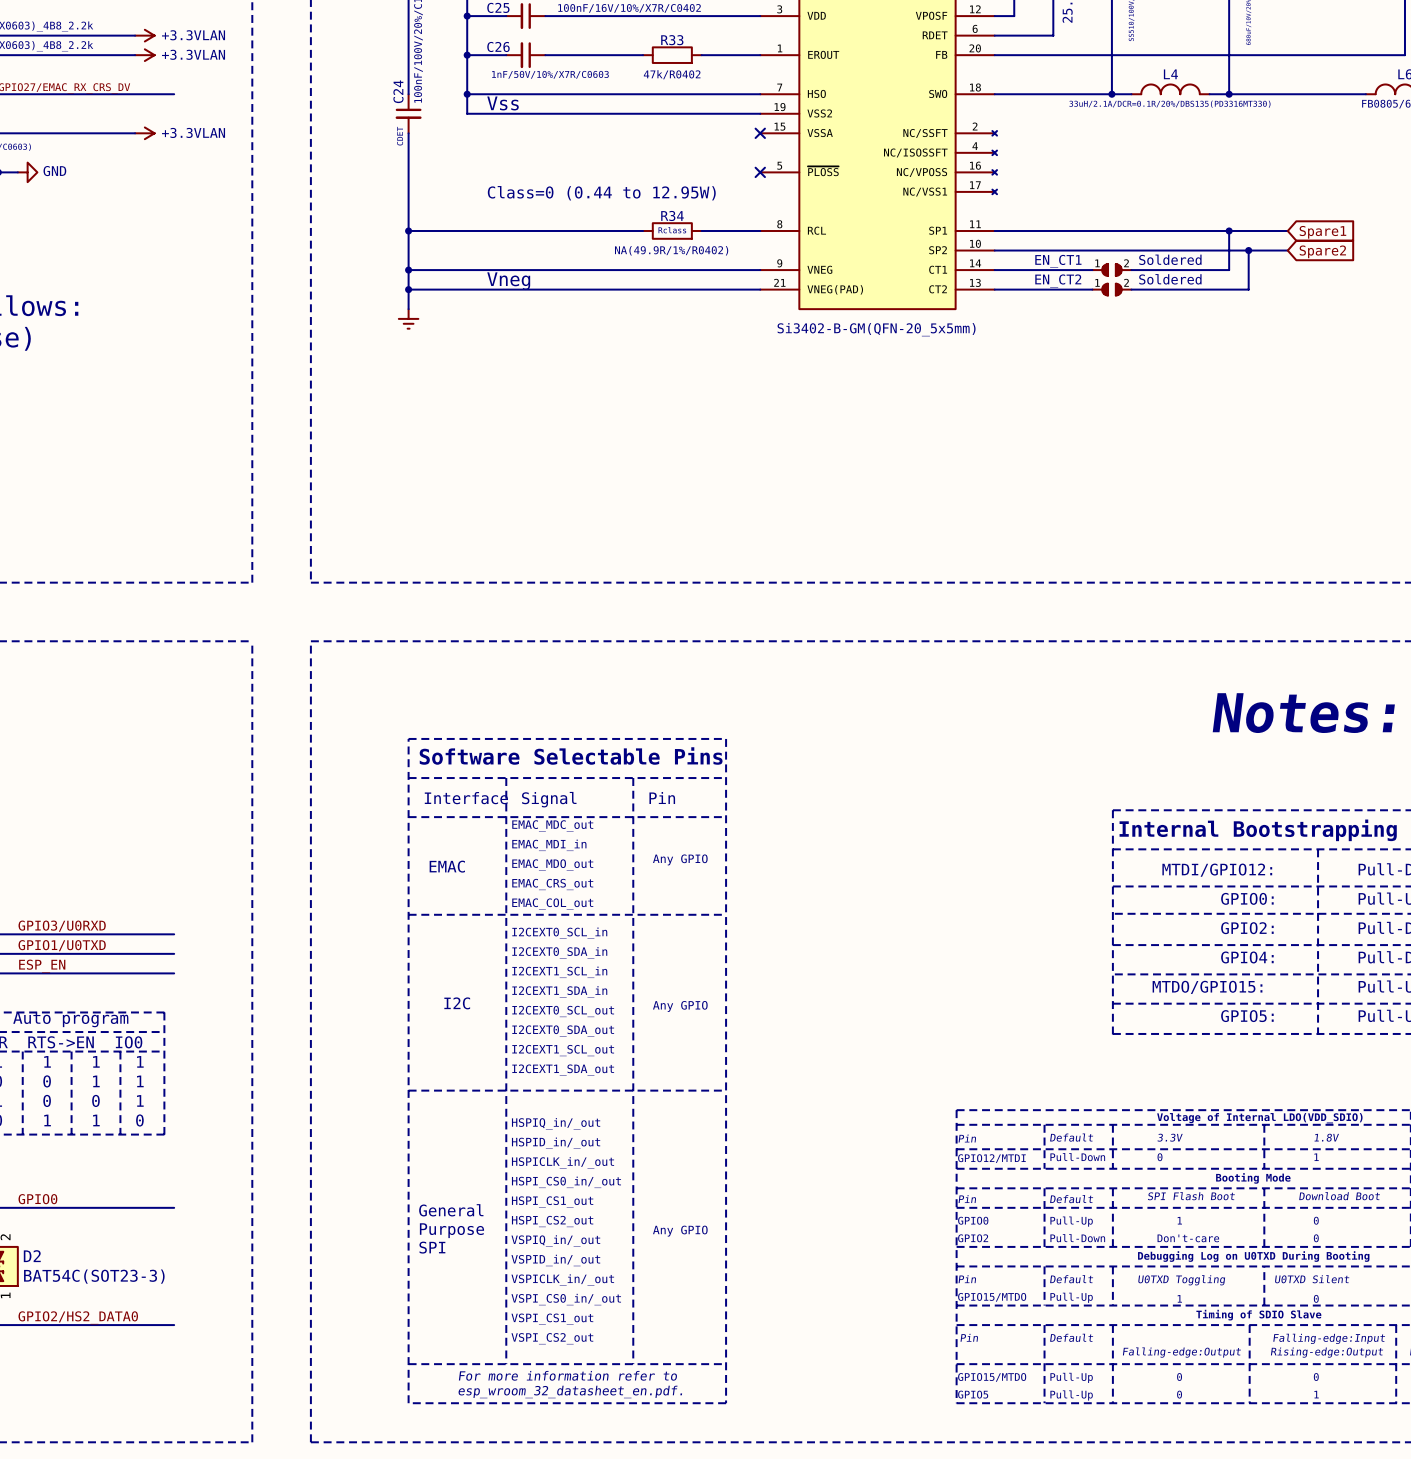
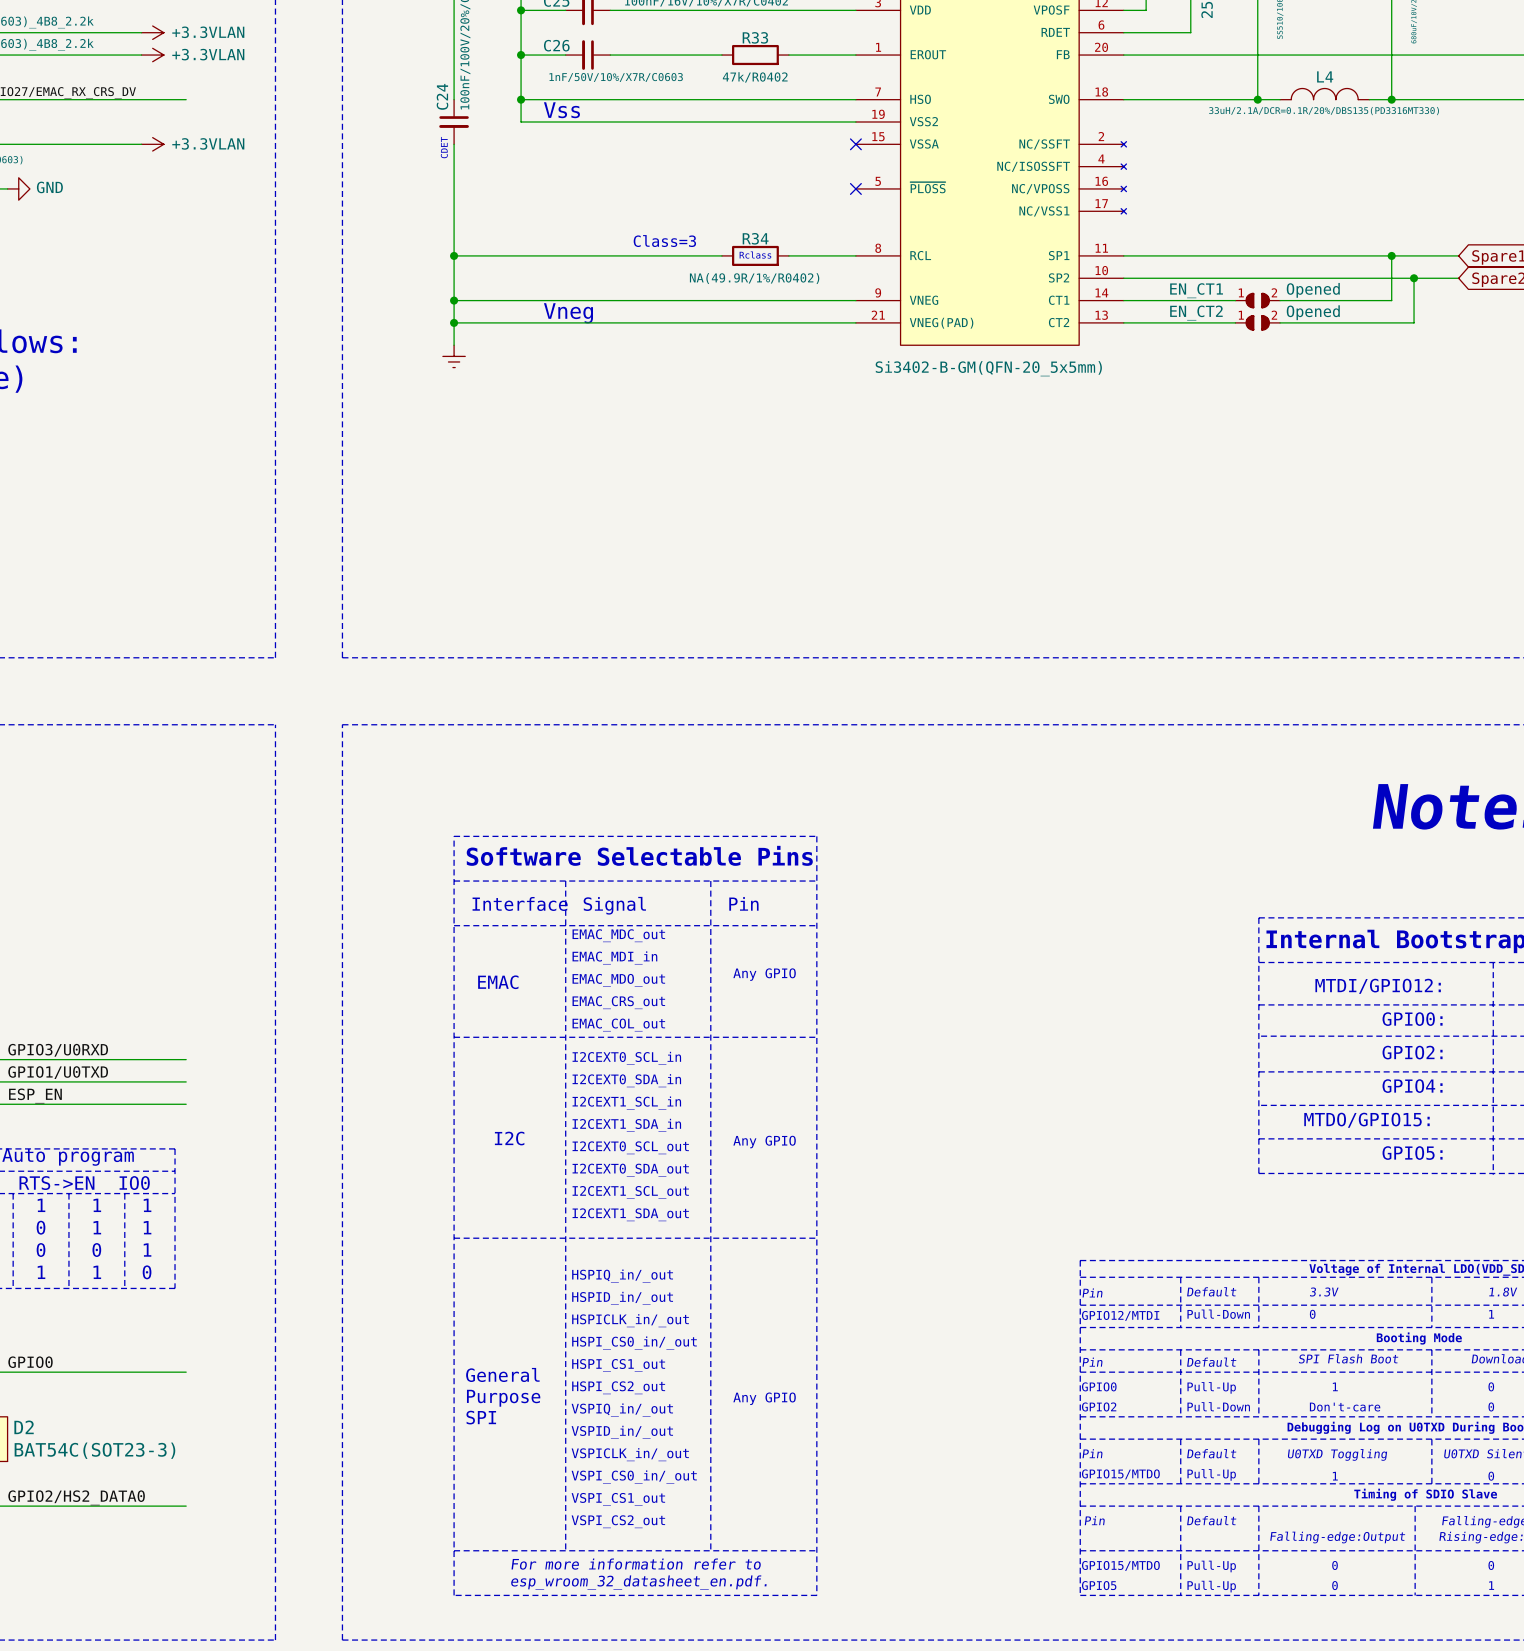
text: Class=0 (0.44 to 12.95W) (601, 193) -> none
text: none -> Class=3 (664, 241)
EN_CT1 value: Soldered (1170, 259) -> Opened (1313, 290)
EN_CT2 value: Soldered (1170, 279) -> Opened (1313, 312)

